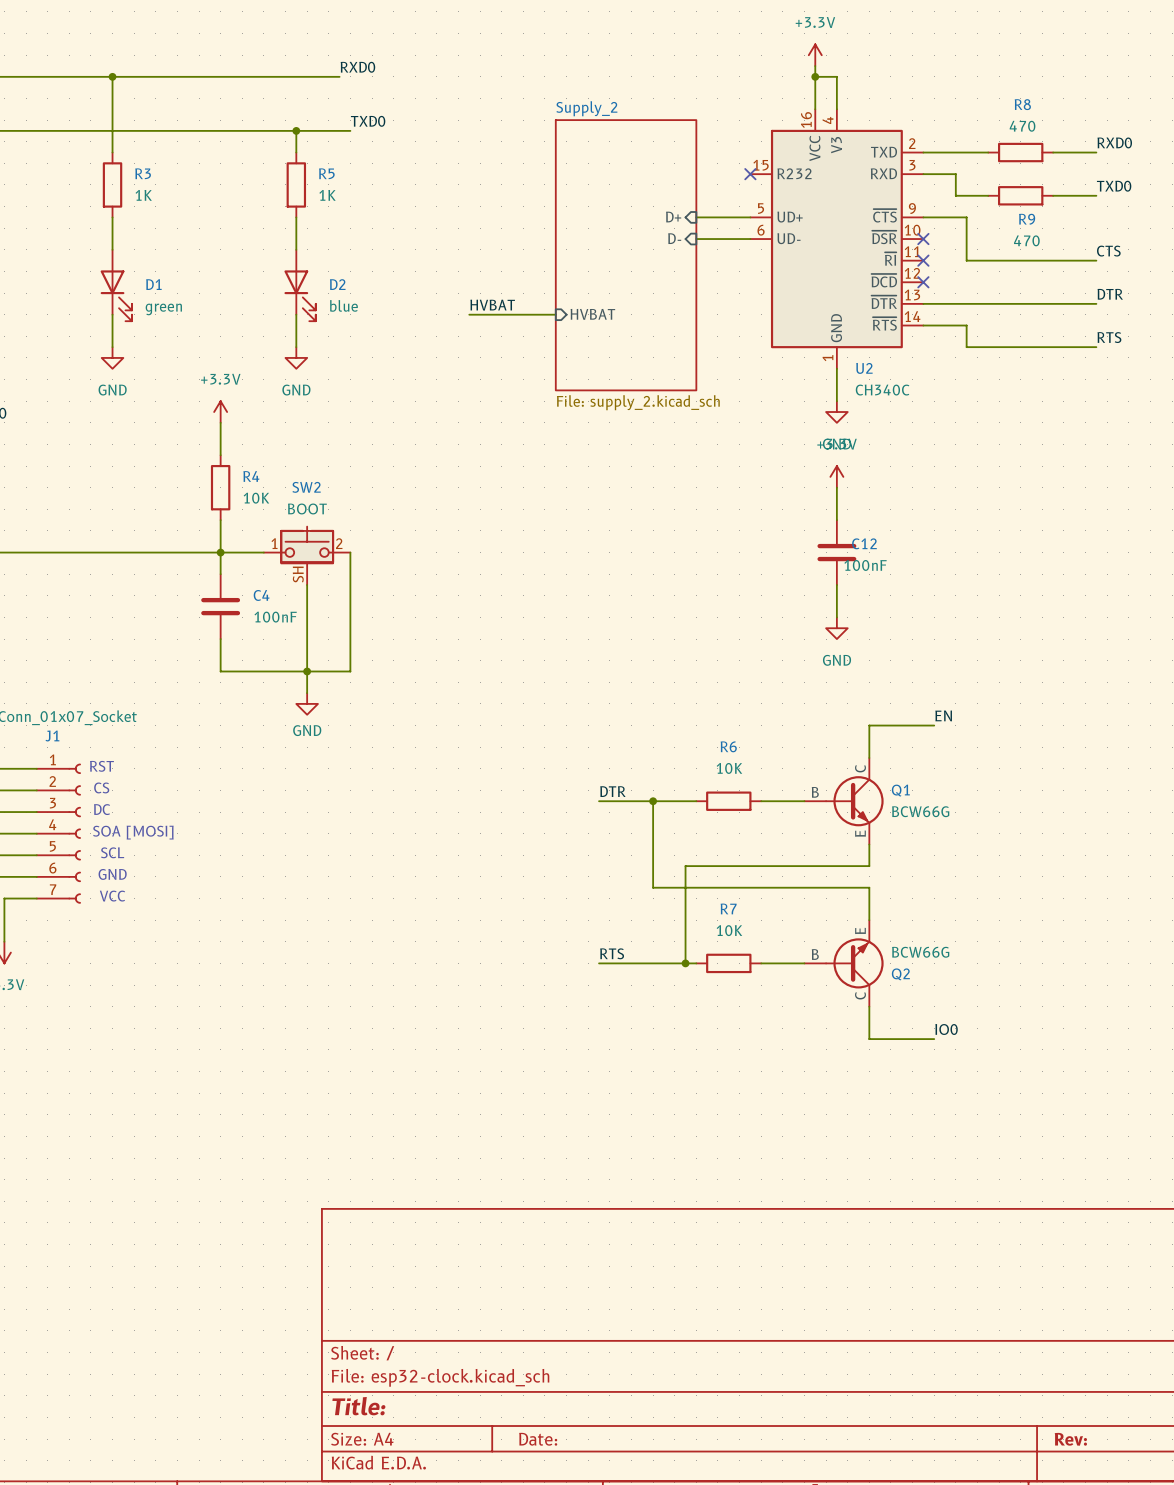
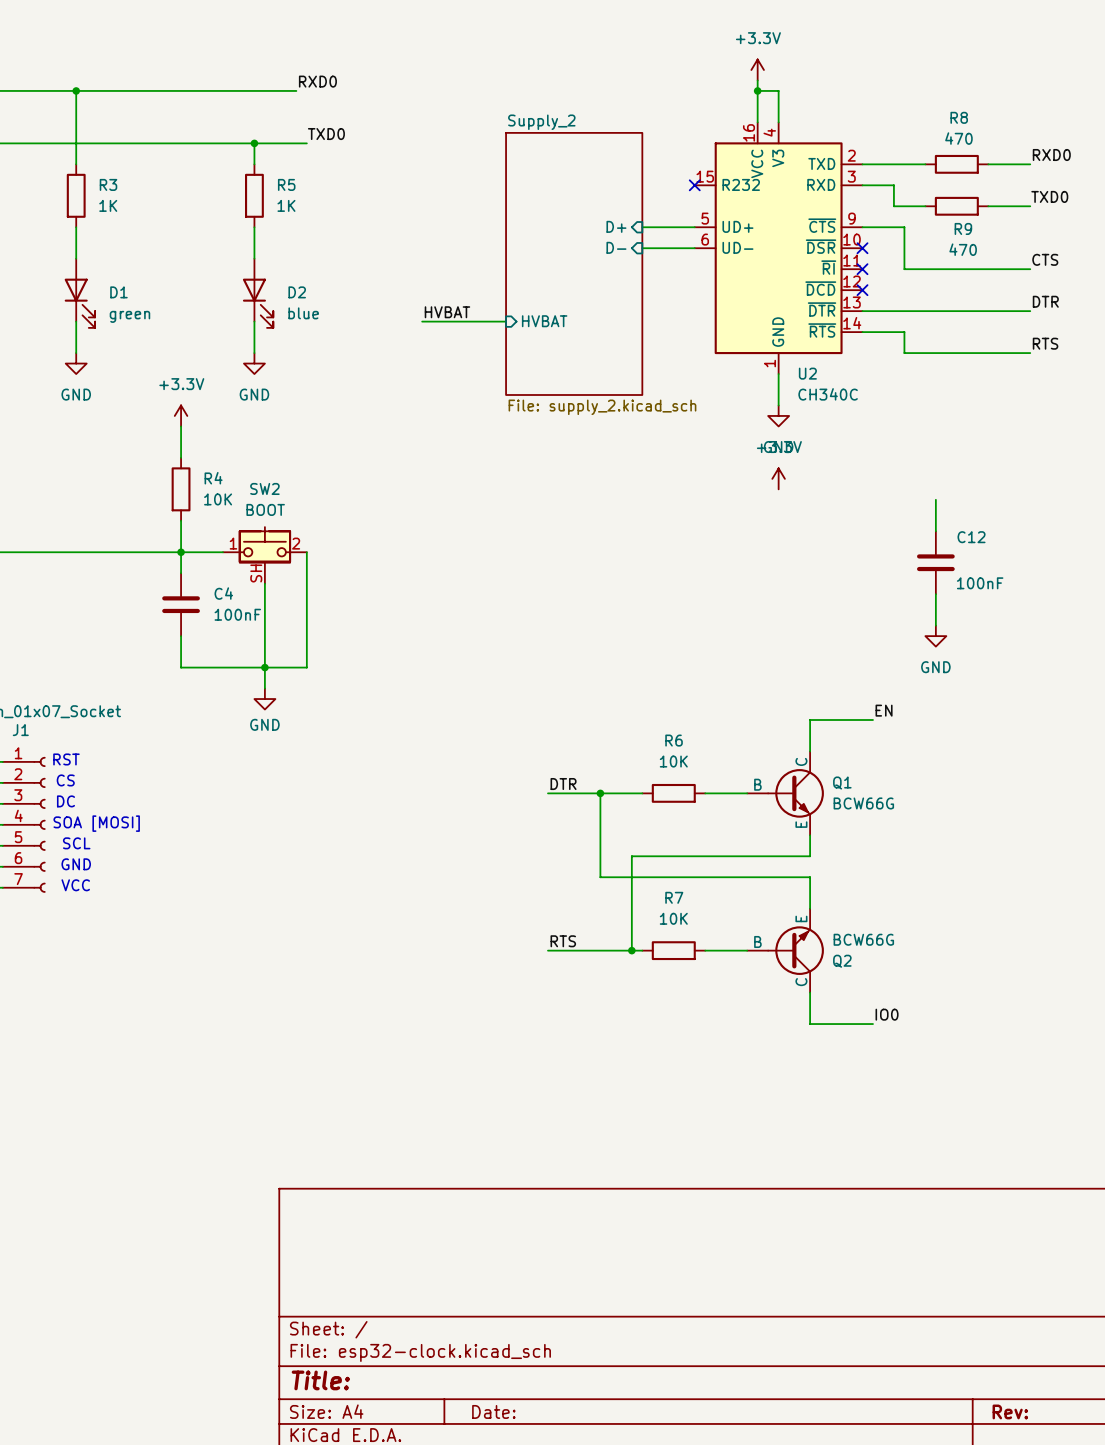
wire: (836, 487) (836, 520) -> (935, 499) (935, 531)
C12 name position: C12 (864, 543) -> C12 (971, 537)
C12 position: (836, 552) -> (935, 562)
C12 value position: 100nF (865, 565) -> 100nF (980, 583)
wire: (836, 585) (836, 617) -> (935, 594) (935, 625)
power symbol position: GND (836, 628) -> GND (935, 636)

